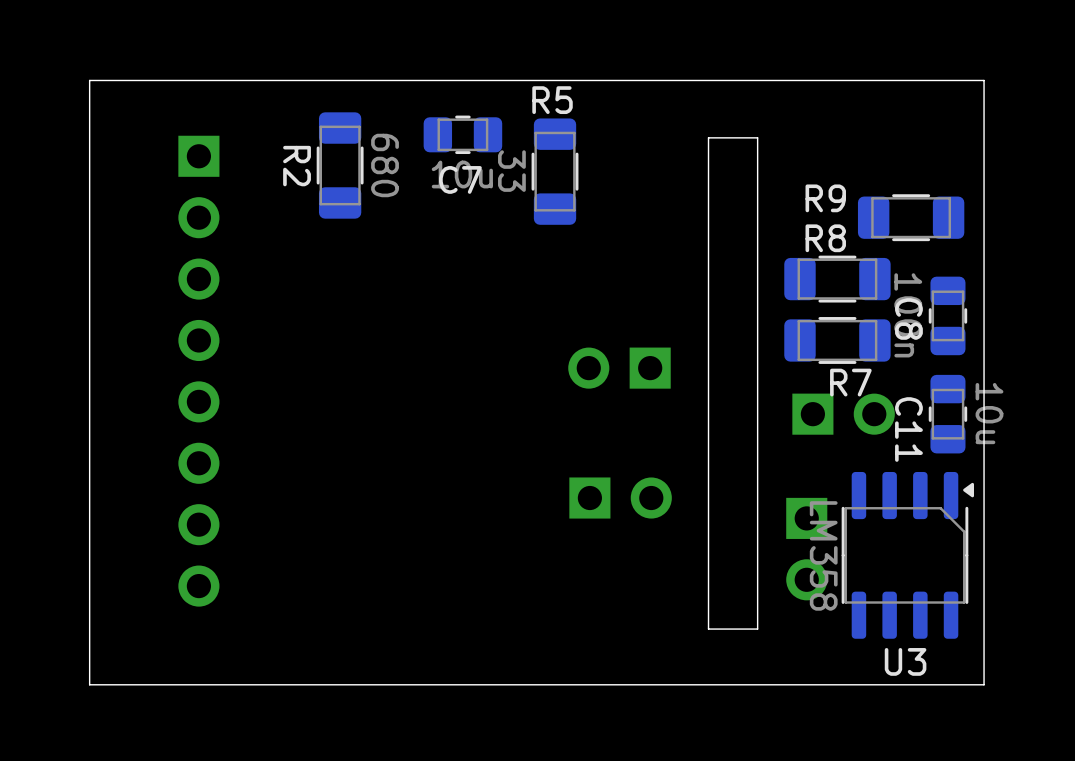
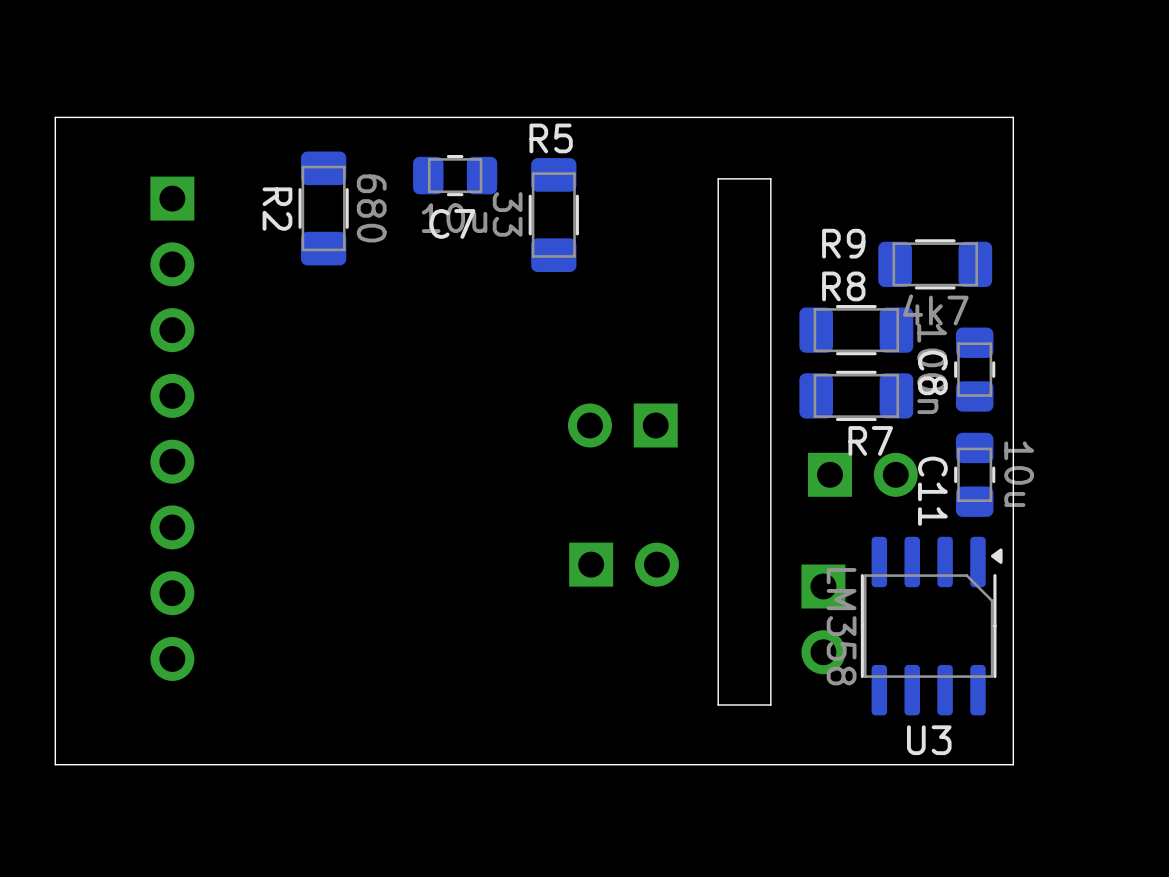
R9 value: none -> 4k7 (935, 309)

